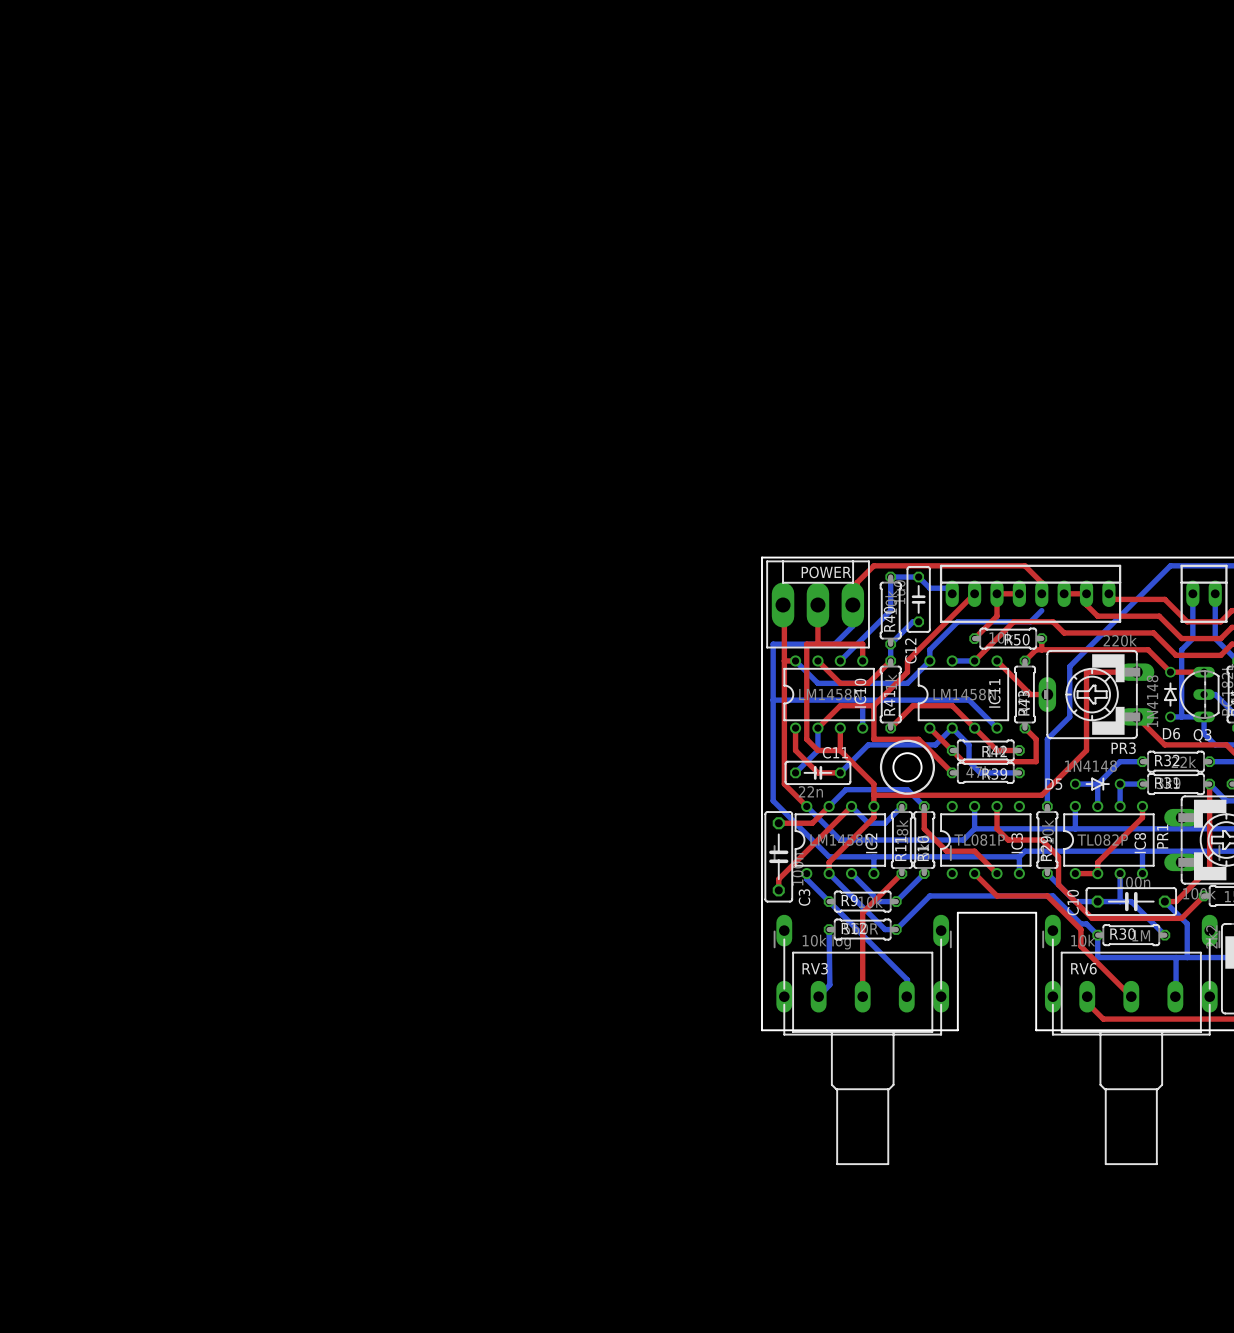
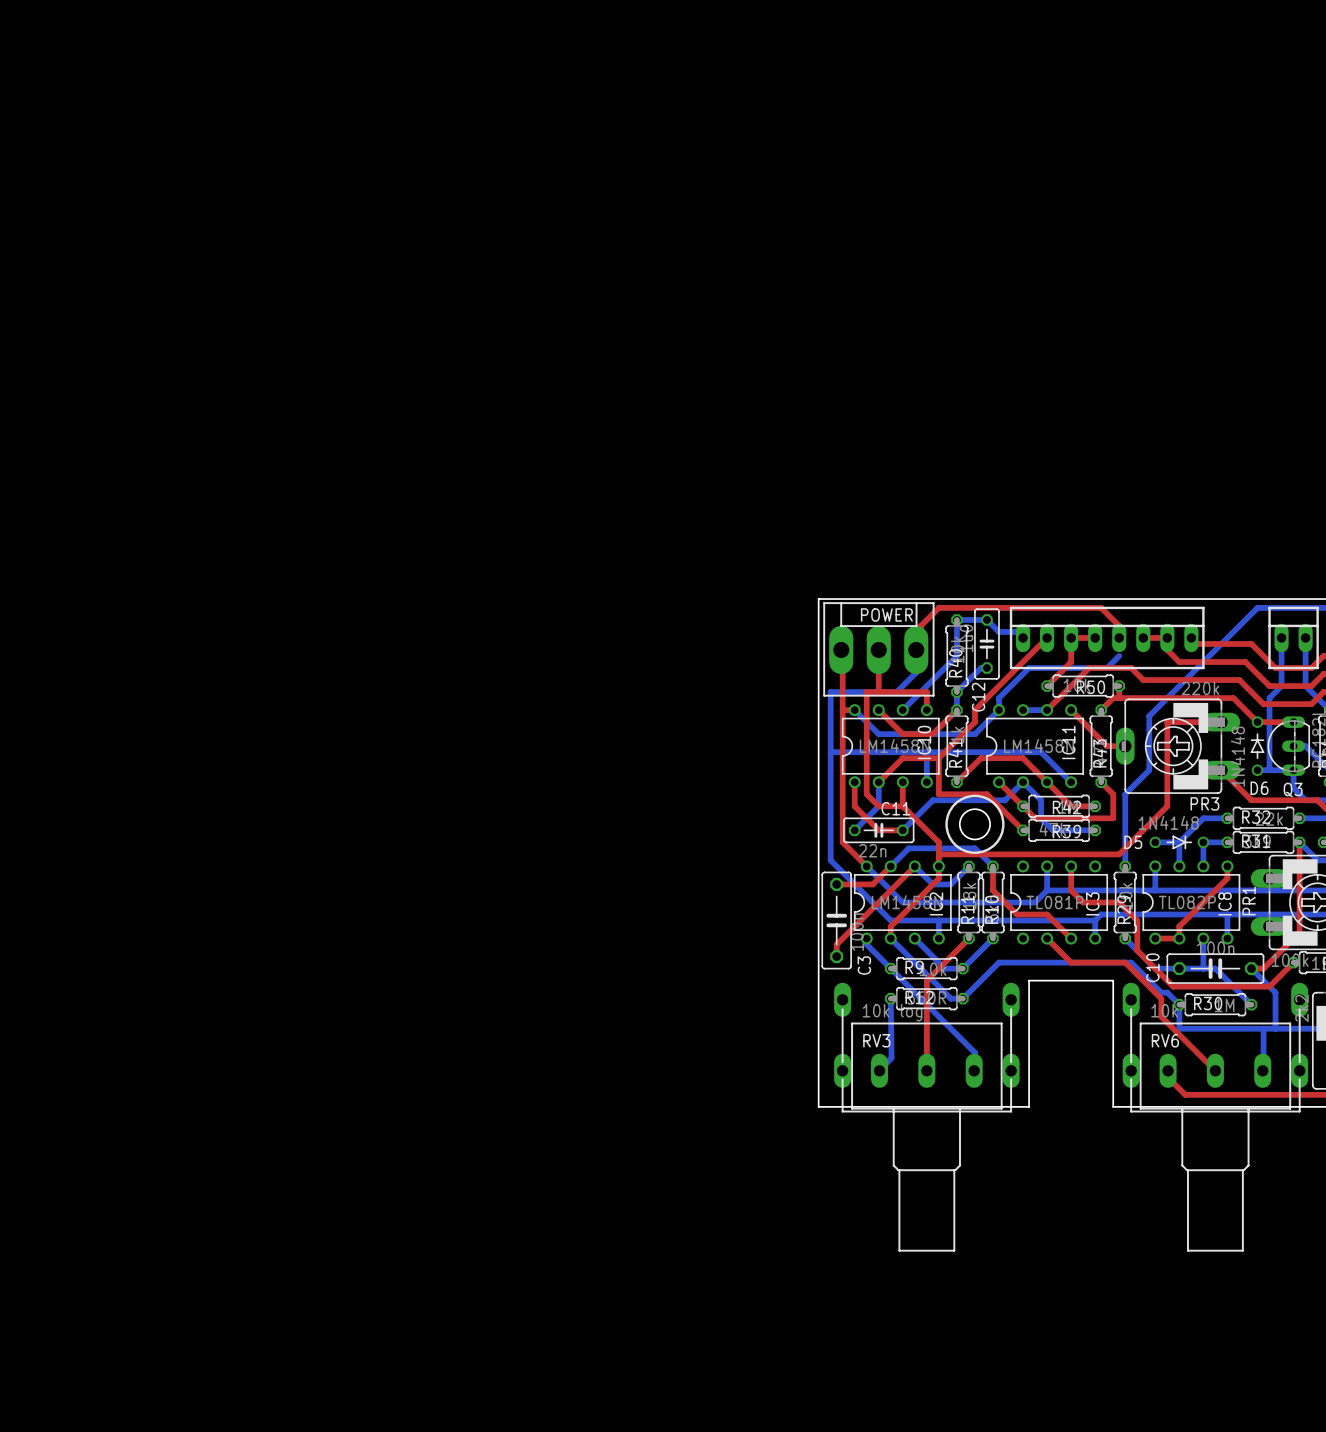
RV3 footprint: [773, 845, 952, 1166] -> [834, 982, 1020, 1252]
RV6 footprint: [1042, 845, 1221, 1166] -> [1122, 982, 1309, 1252]

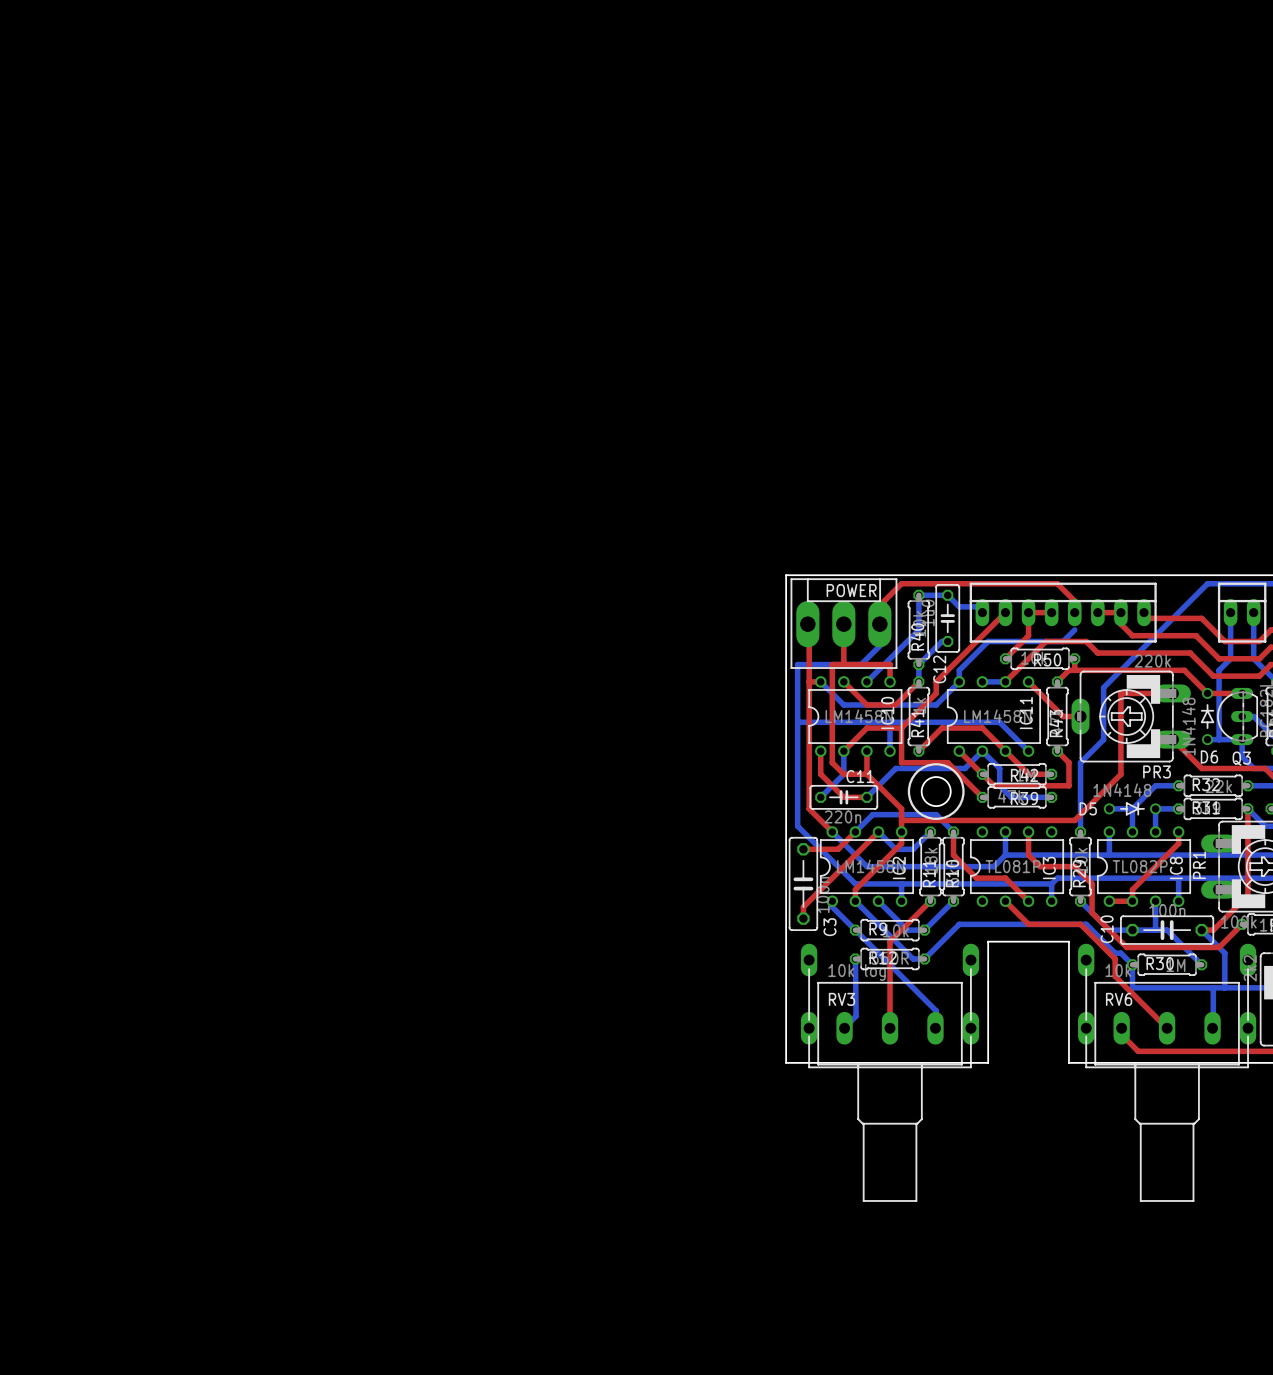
C11 value: 22n (872, 850) -> 220n (842, 816)

